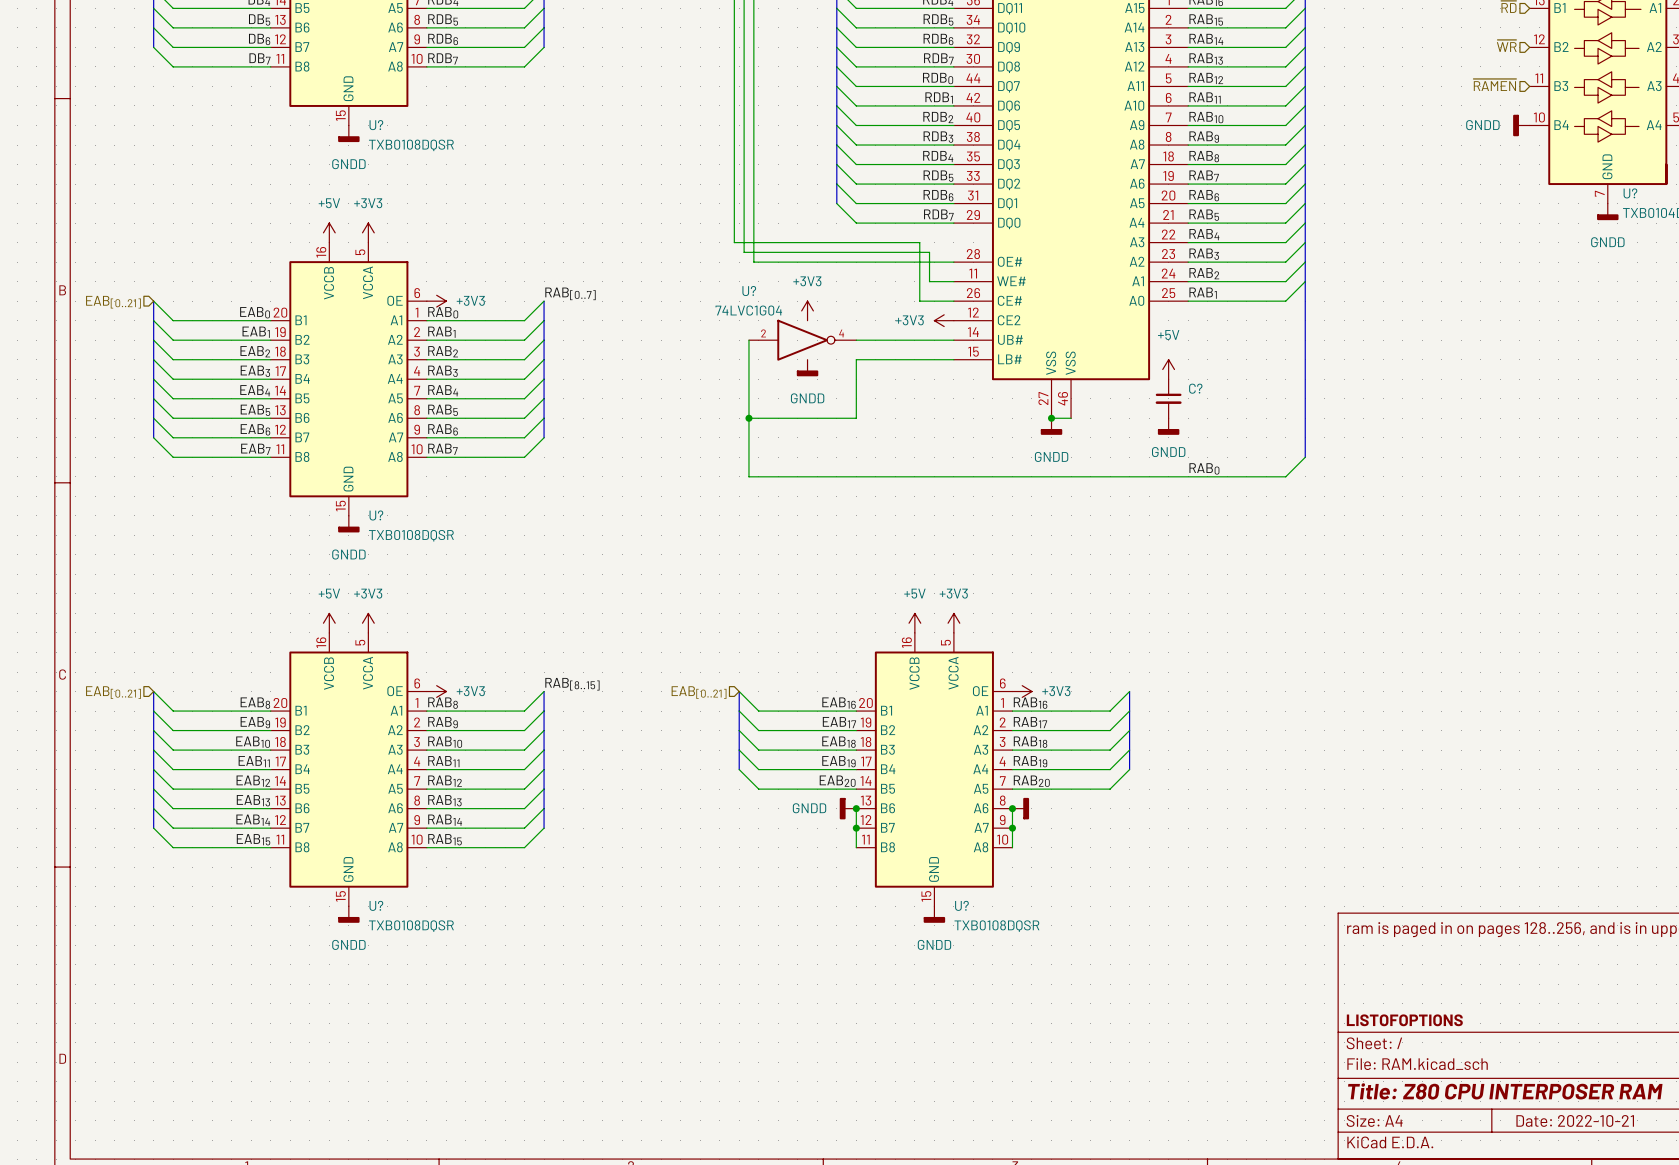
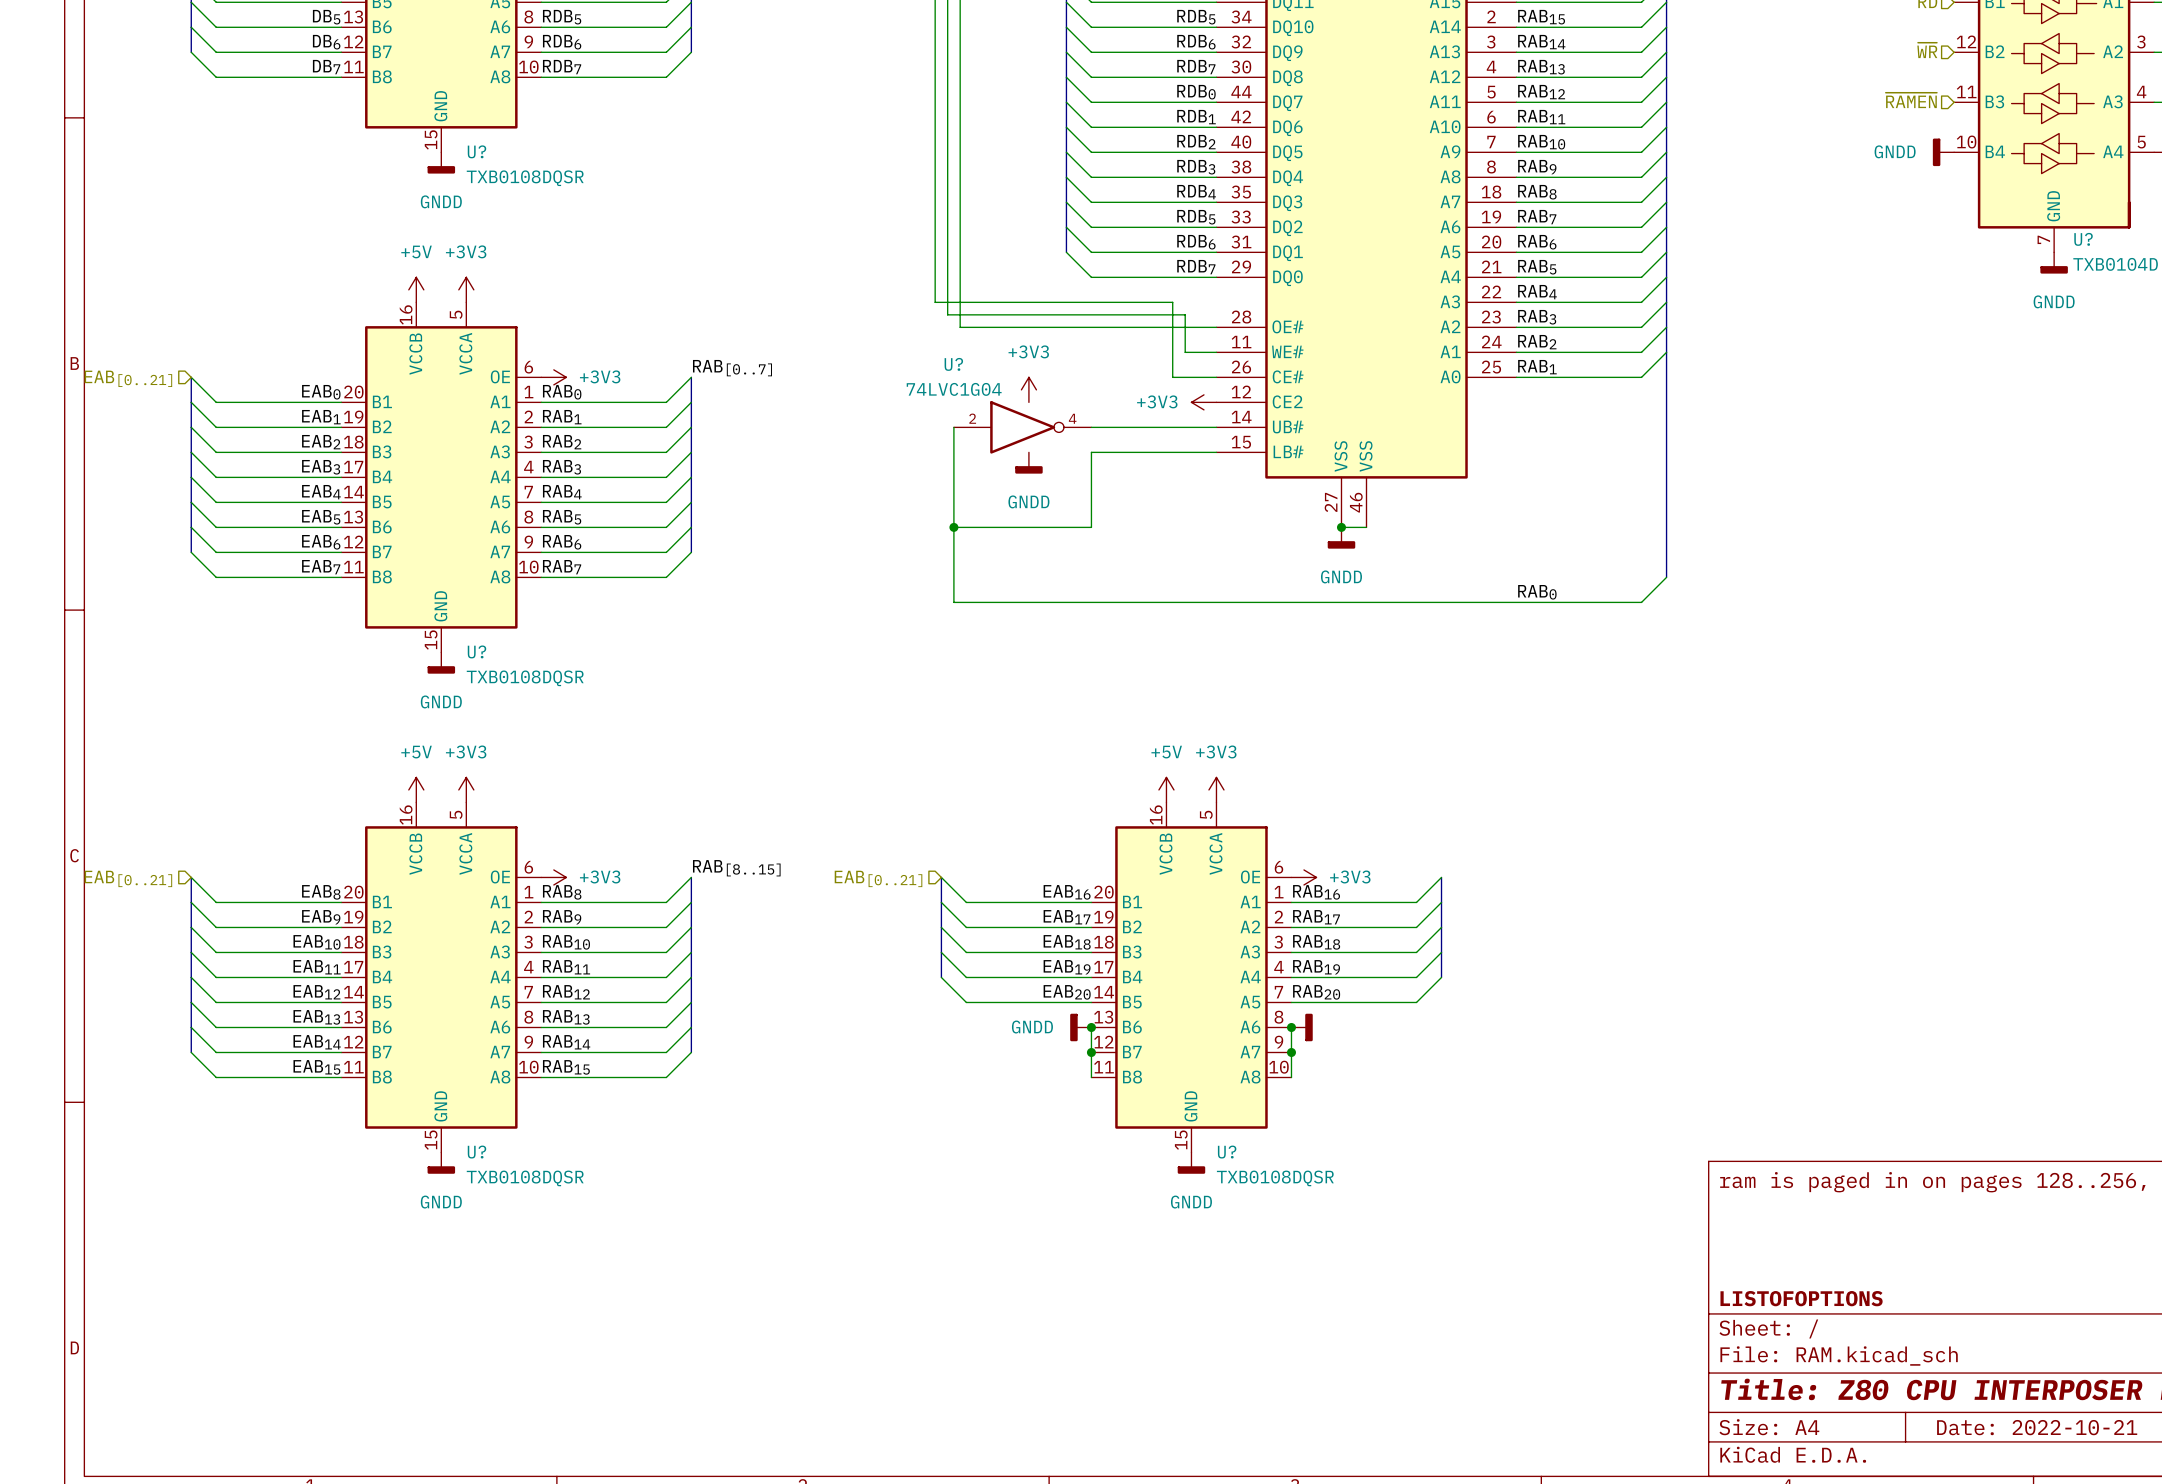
power symbol: +5V (1168, 369) -> none
C?: (1168, 398) -> none
power symbol: GNDD (1168, 426) -> none

